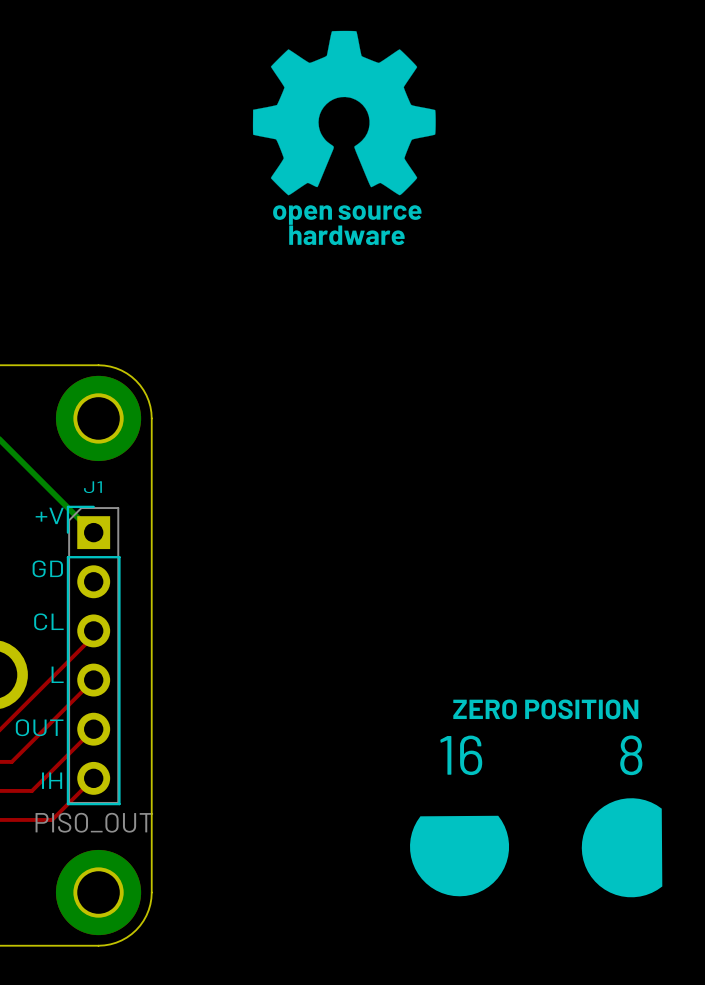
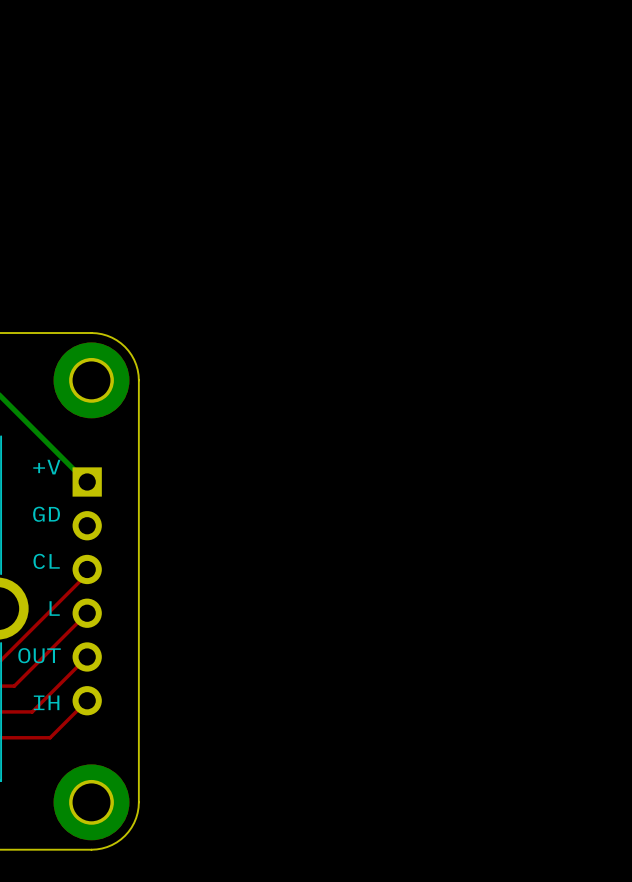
drawing: [252, 30, 436, 196] -> none
text: source (380, 212) -> none
text: open (302, 215) -> none
text: hardware (346, 235) -> none
J1 side: bottom (93, 655) -> top (87, 591)
text: ZERO POSITION (545, 709) -> none
text: 16 (461, 755) -> none
text: 8 (631, 755) -> none
drawing: [581, 798, 663, 898] -> none
drawing: [410, 815, 510, 897] -> none

